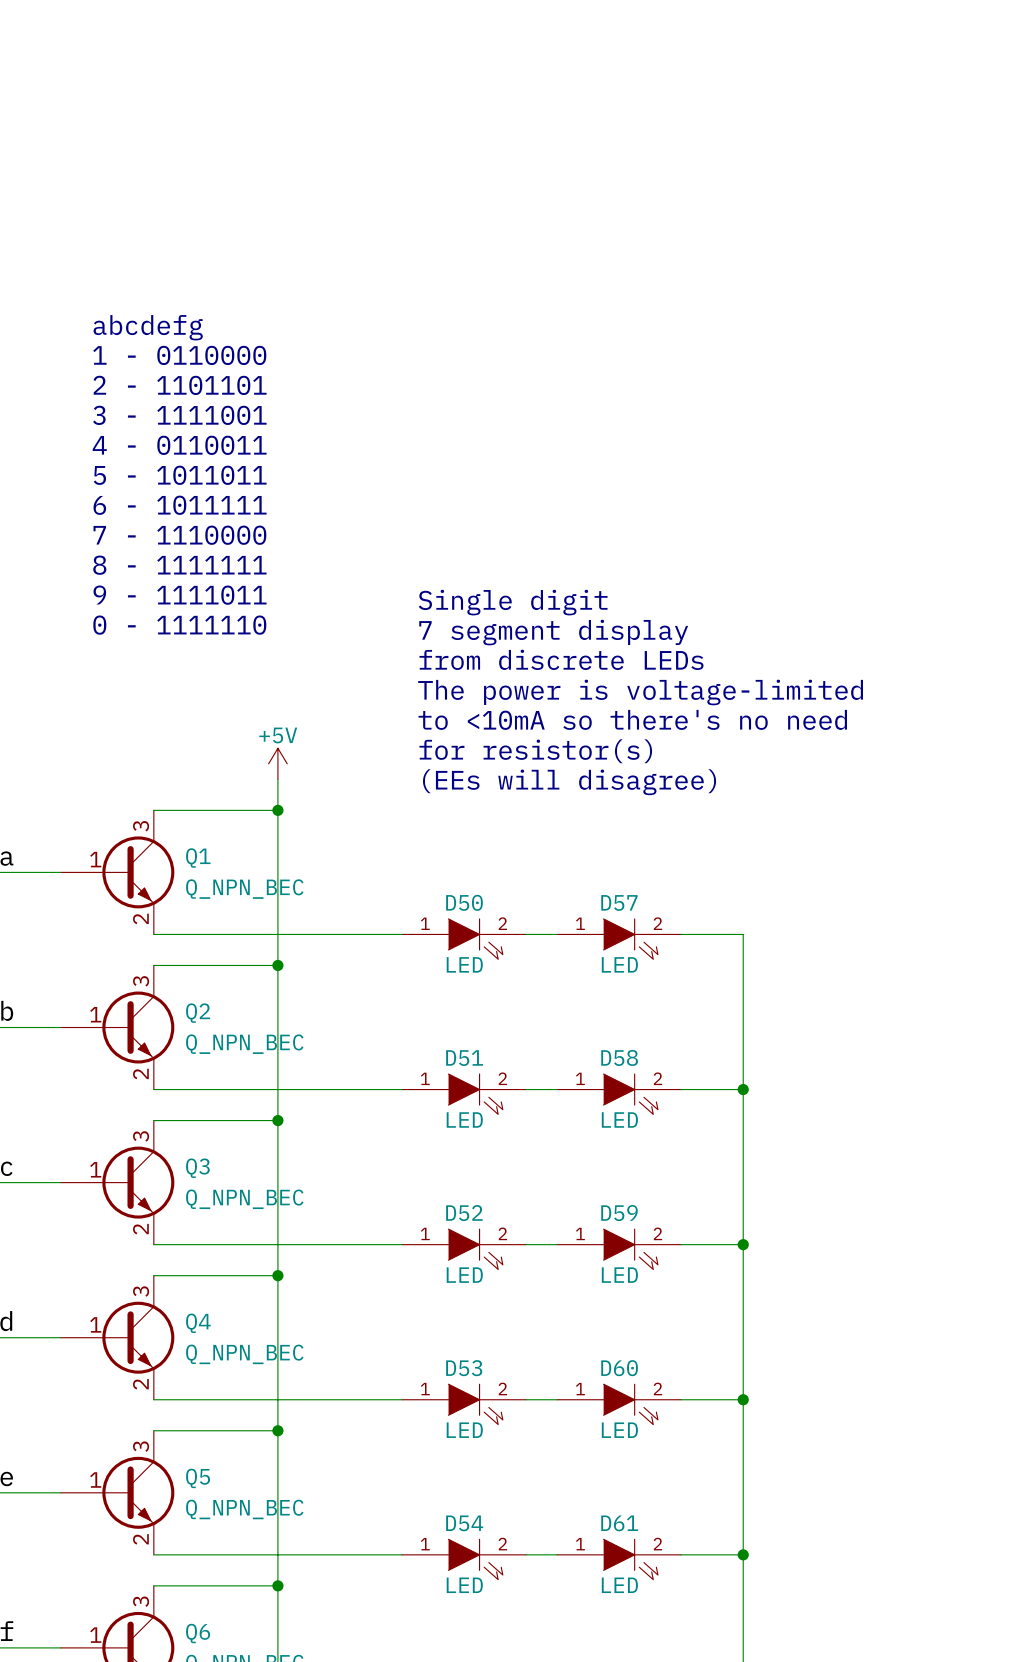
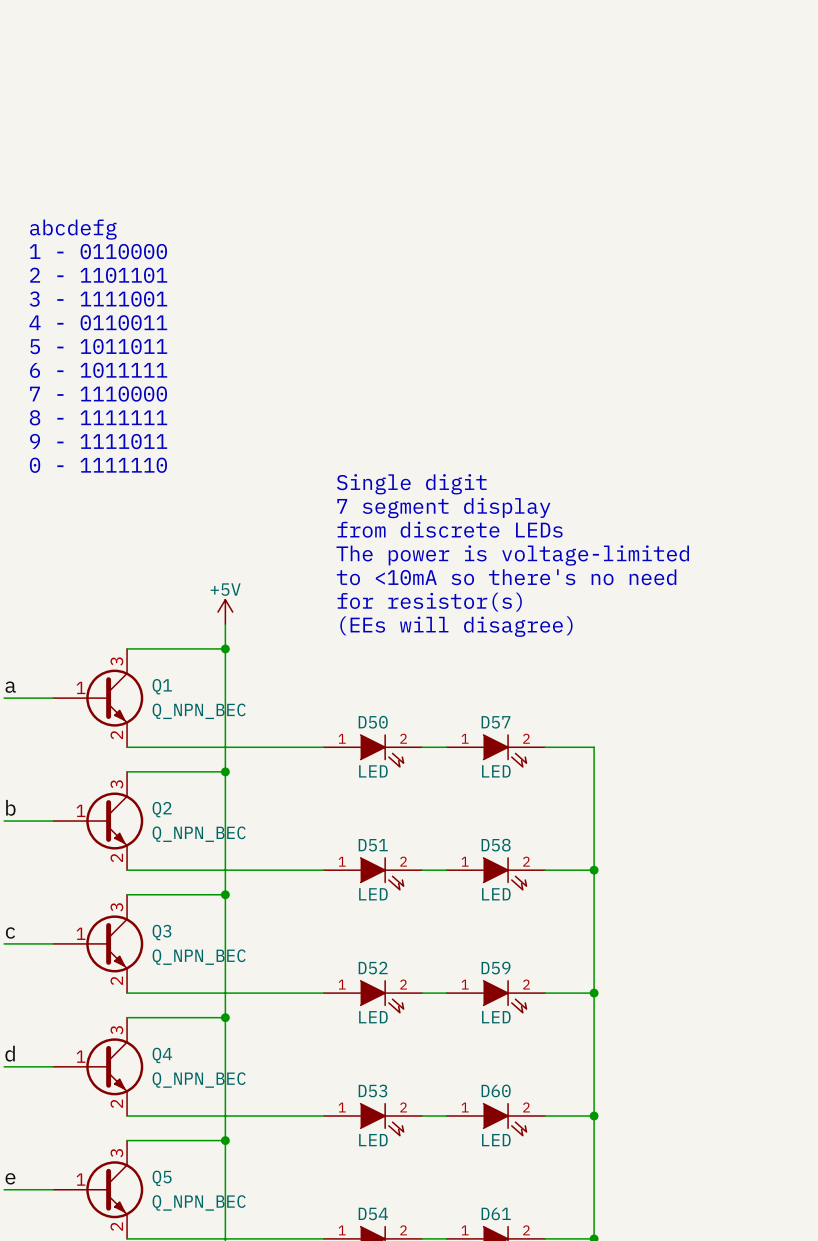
text position: abcdefg (148, 327) -> abcdefg (73, 229)
text position: 1 - 0110000 (179, 355) -> 1 - 0110000 (98, 251)
text position: 2 - 1101101 (180, 385) -> 2 - 1101101 (98, 275)
text position: 3 - 1111001 (179, 415) -> 3 - 1111001 (98, 299)
text position: 4 - 0110011 (179, 445) -> 4 - 0110011 (98, 322)
text position: 5 - 1011011 (180, 475) -> 5 - 1011011 (98, 346)
text position: 6 - 1011111 (180, 505) -> 6 - 1011111 (98, 370)
text position: 7 - 1110000 (179, 535) -> 7 - 1110000 (98, 394)
text position: 8 - 1111111 (179, 565) -> 8 - 1111111 (98, 417)
text position: 9 - 1111011 (180, 595) -> 9 - 1111011 (98, 441)
text position: 0 - 1111110 (179, 625) -> 0 - 1111110 (98, 465)

